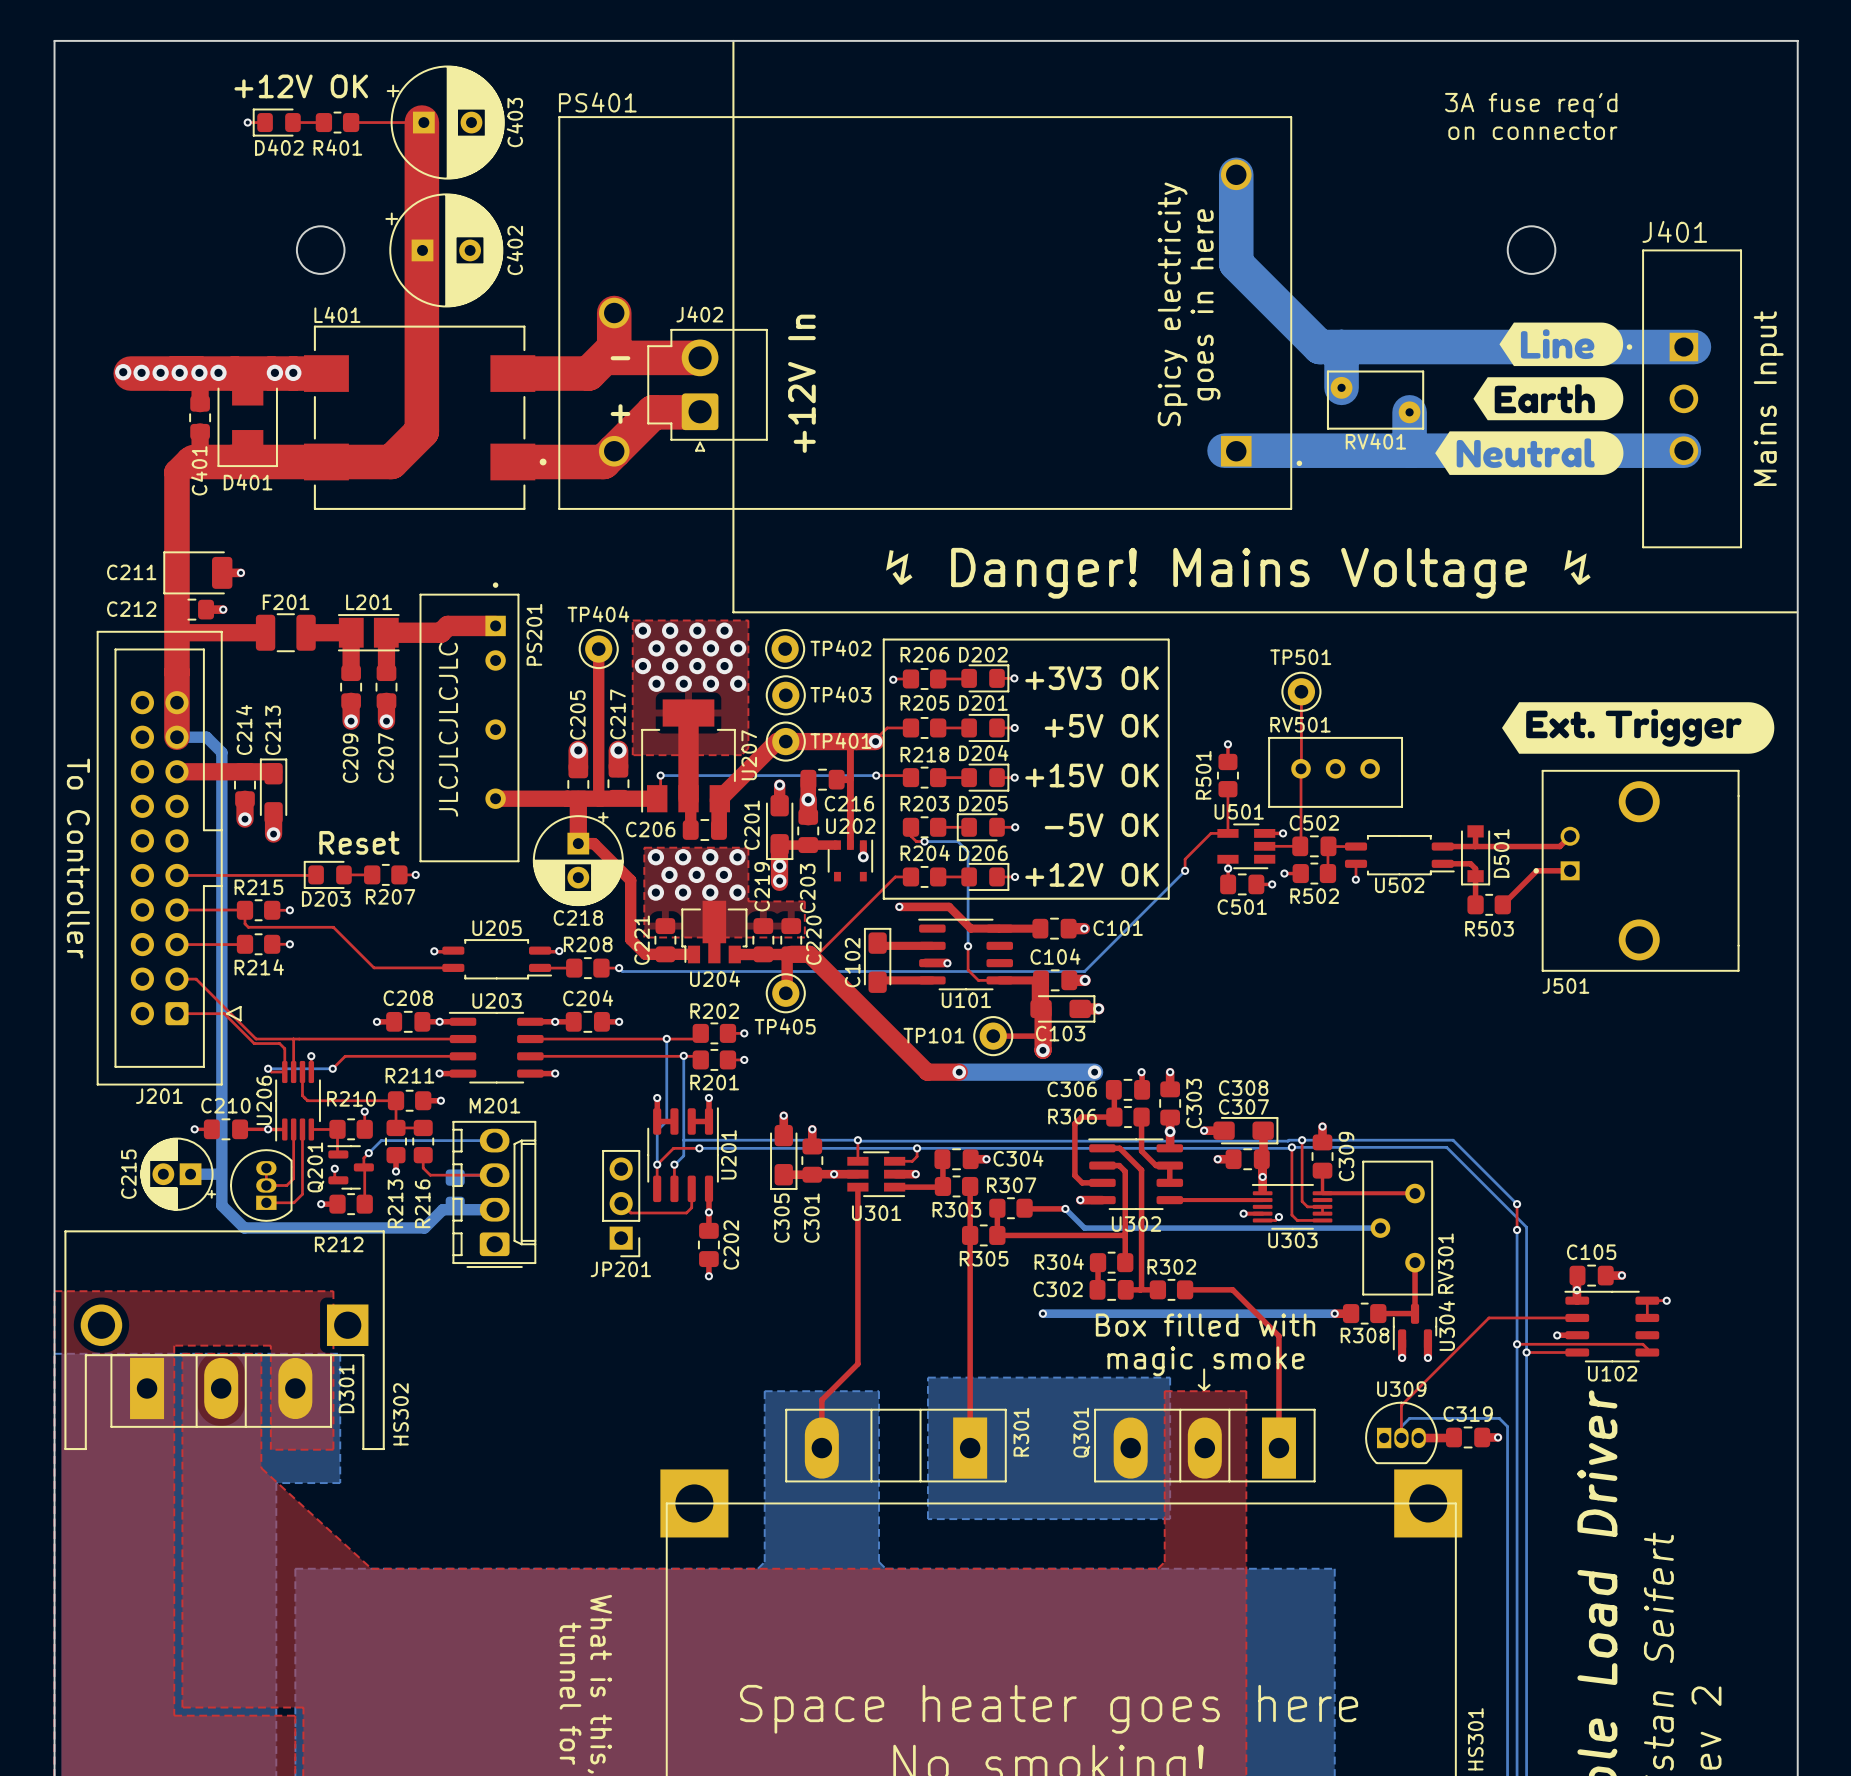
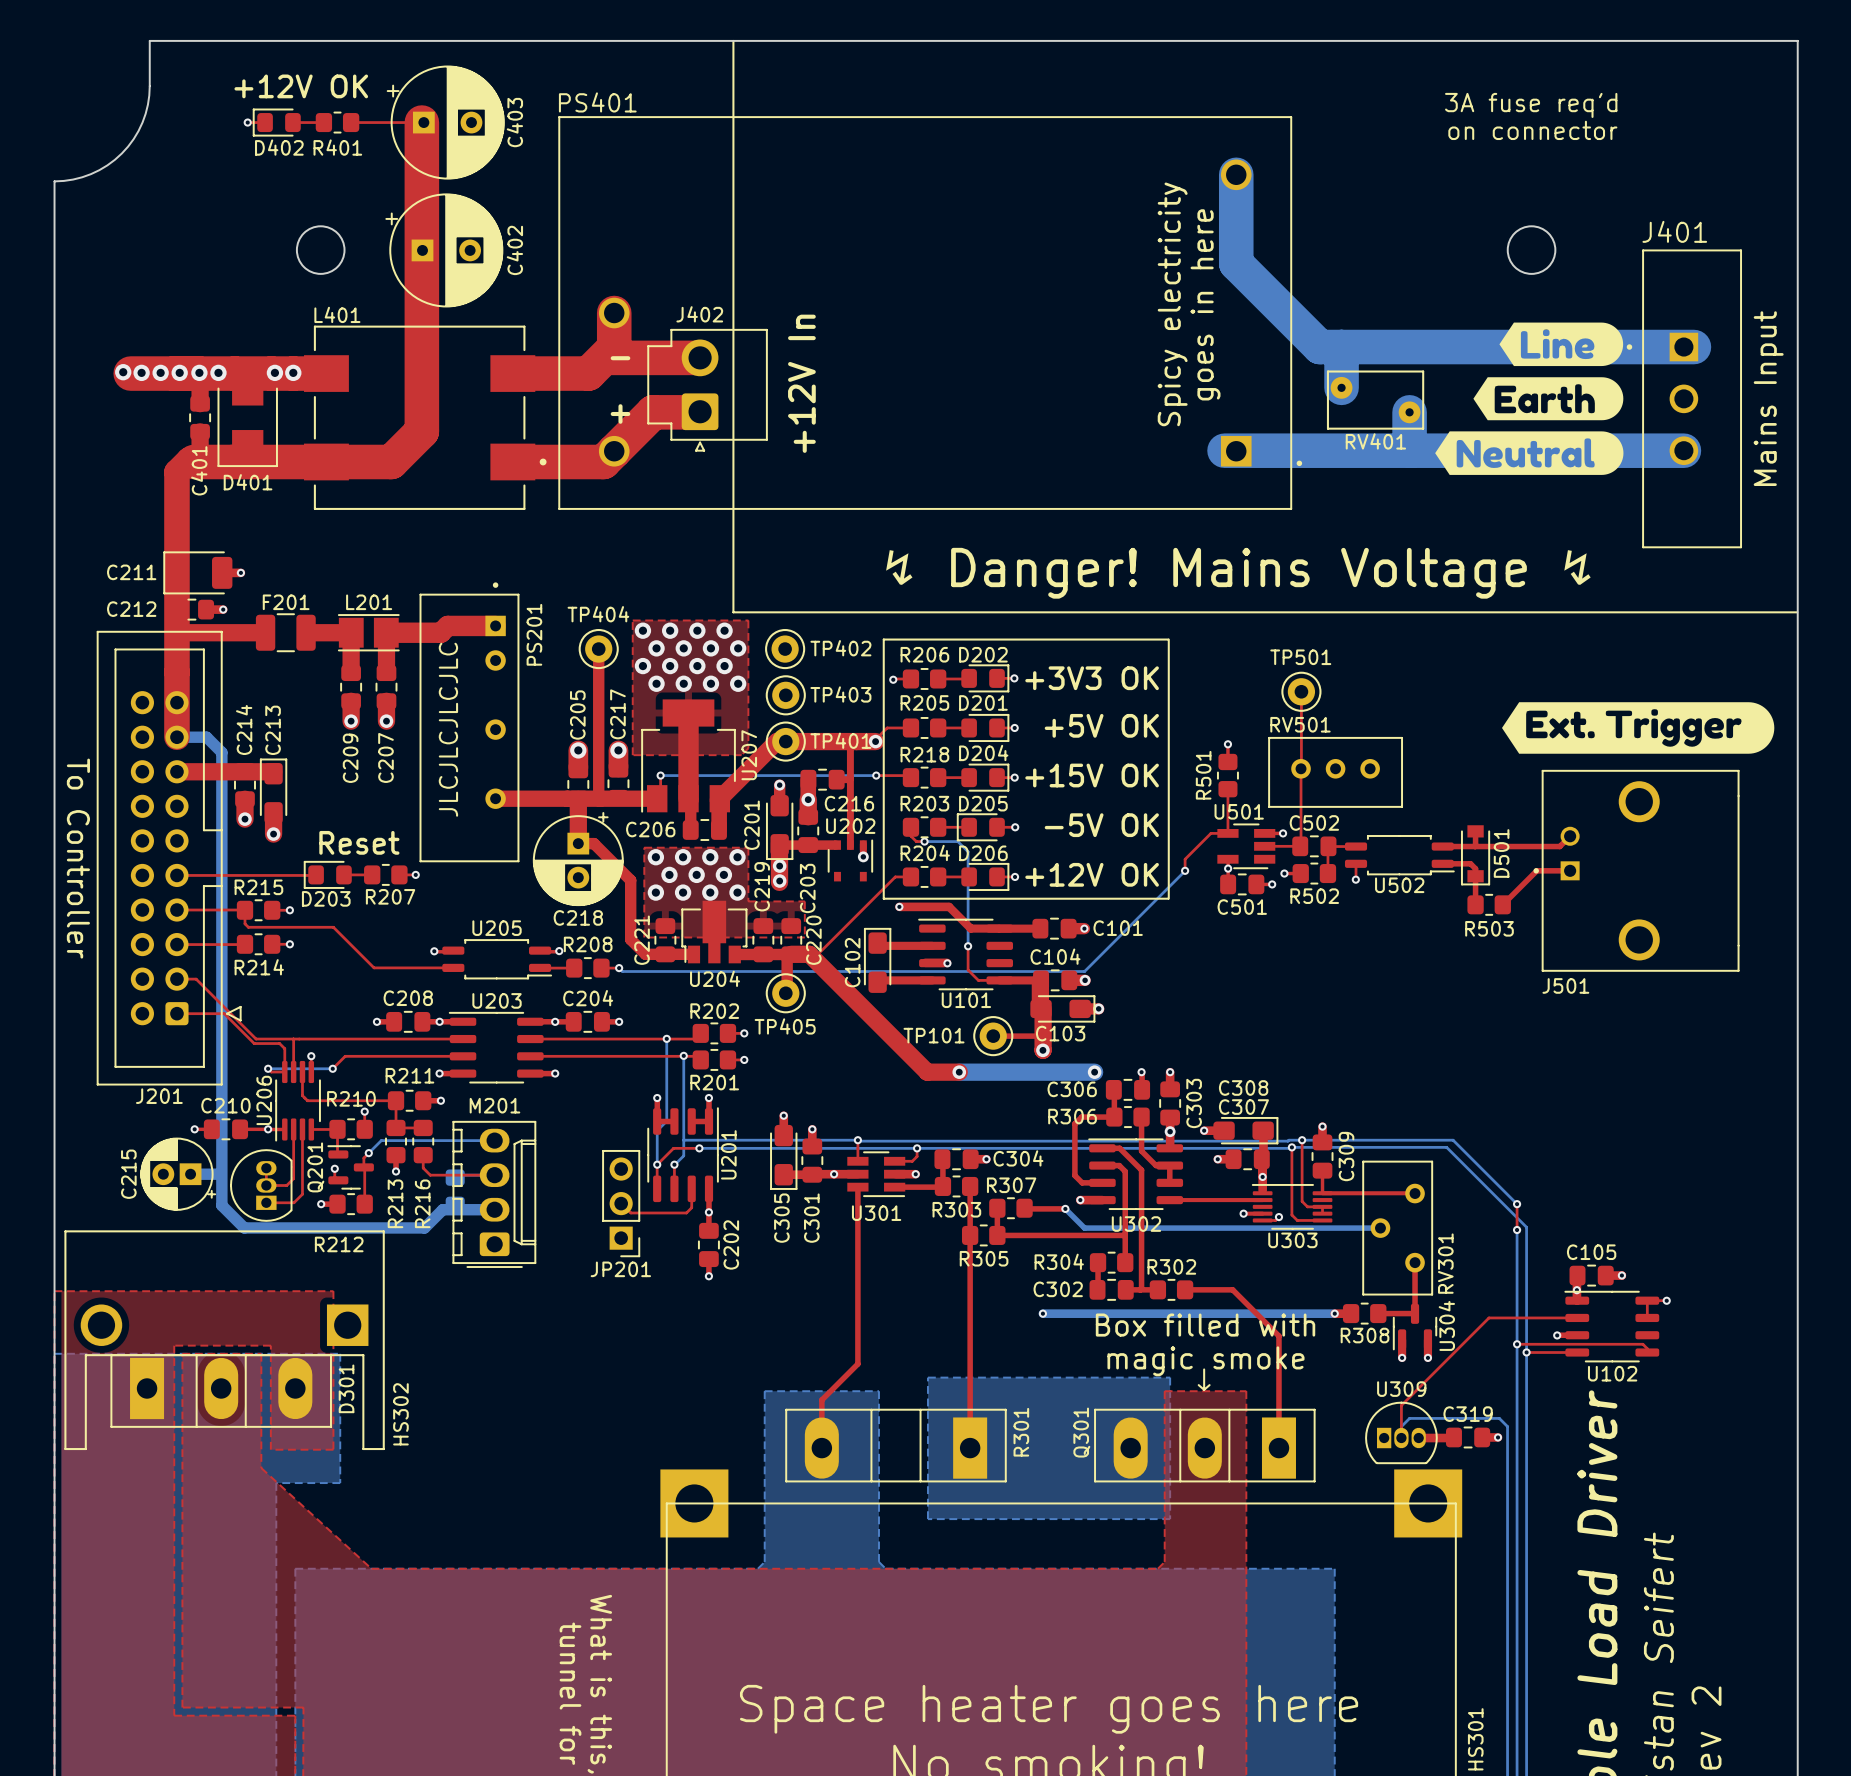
board edge: (149, 40) (54, 40) (54, 181) -> (149, 40) (147, 104) (142, 122) (133, 139) (114, 159) (99, 170) (73, 179) (54, 181)

